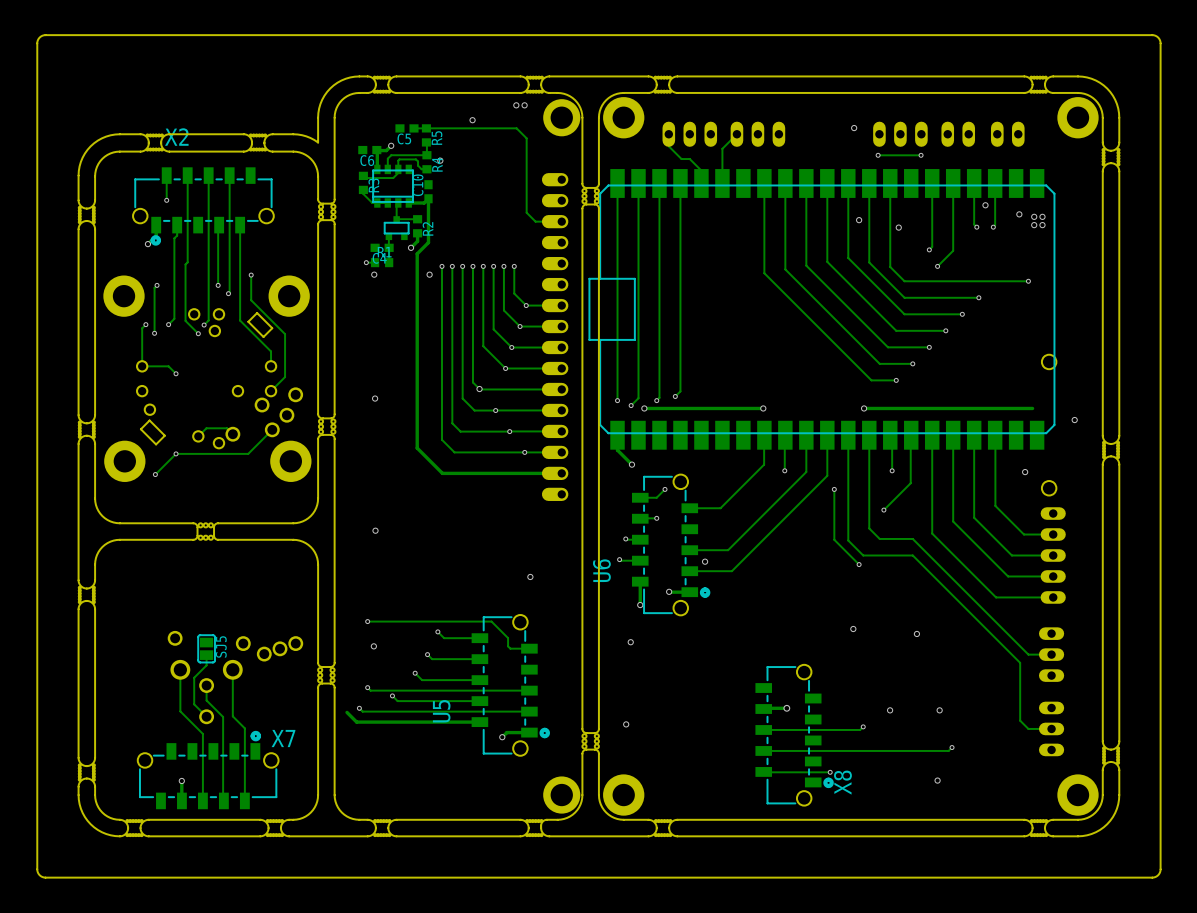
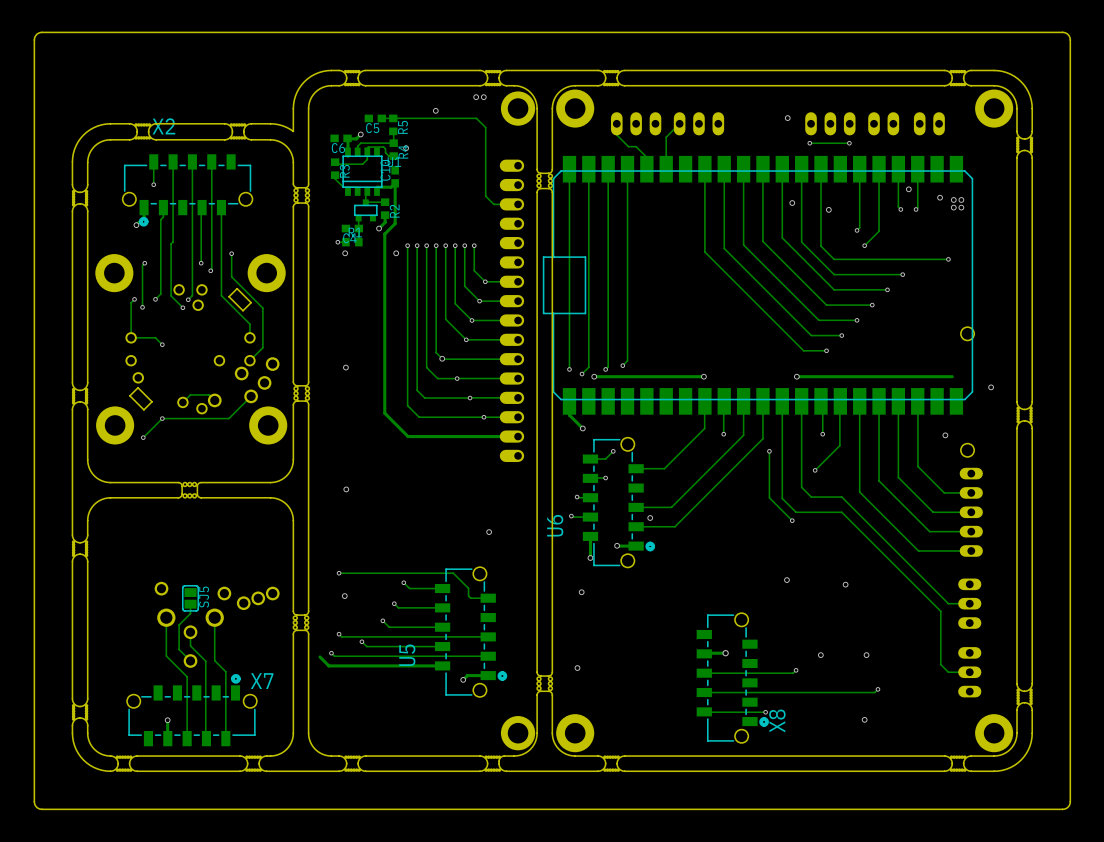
part: (393, 186) -> none
U1: none -> (362, 171)

